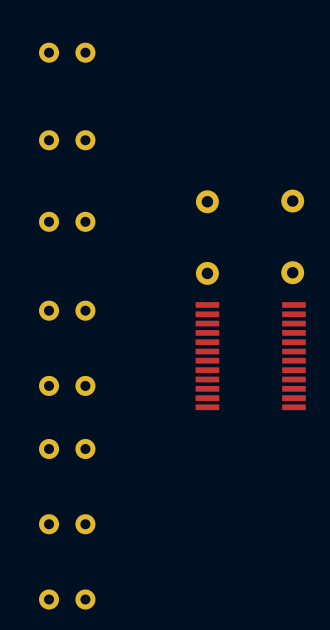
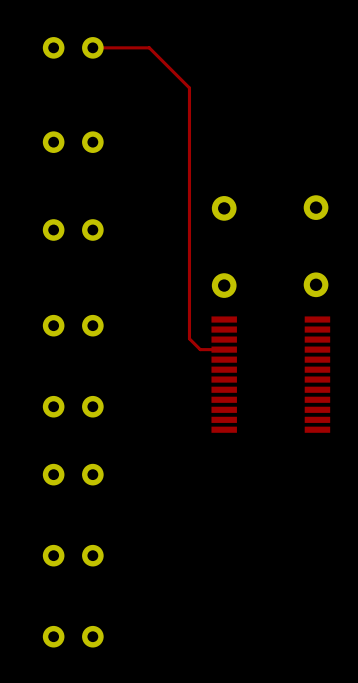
top track: none -> (92, 47) (149, 47) (189, 87) (189, 338) (200, 349) (224, 349)

